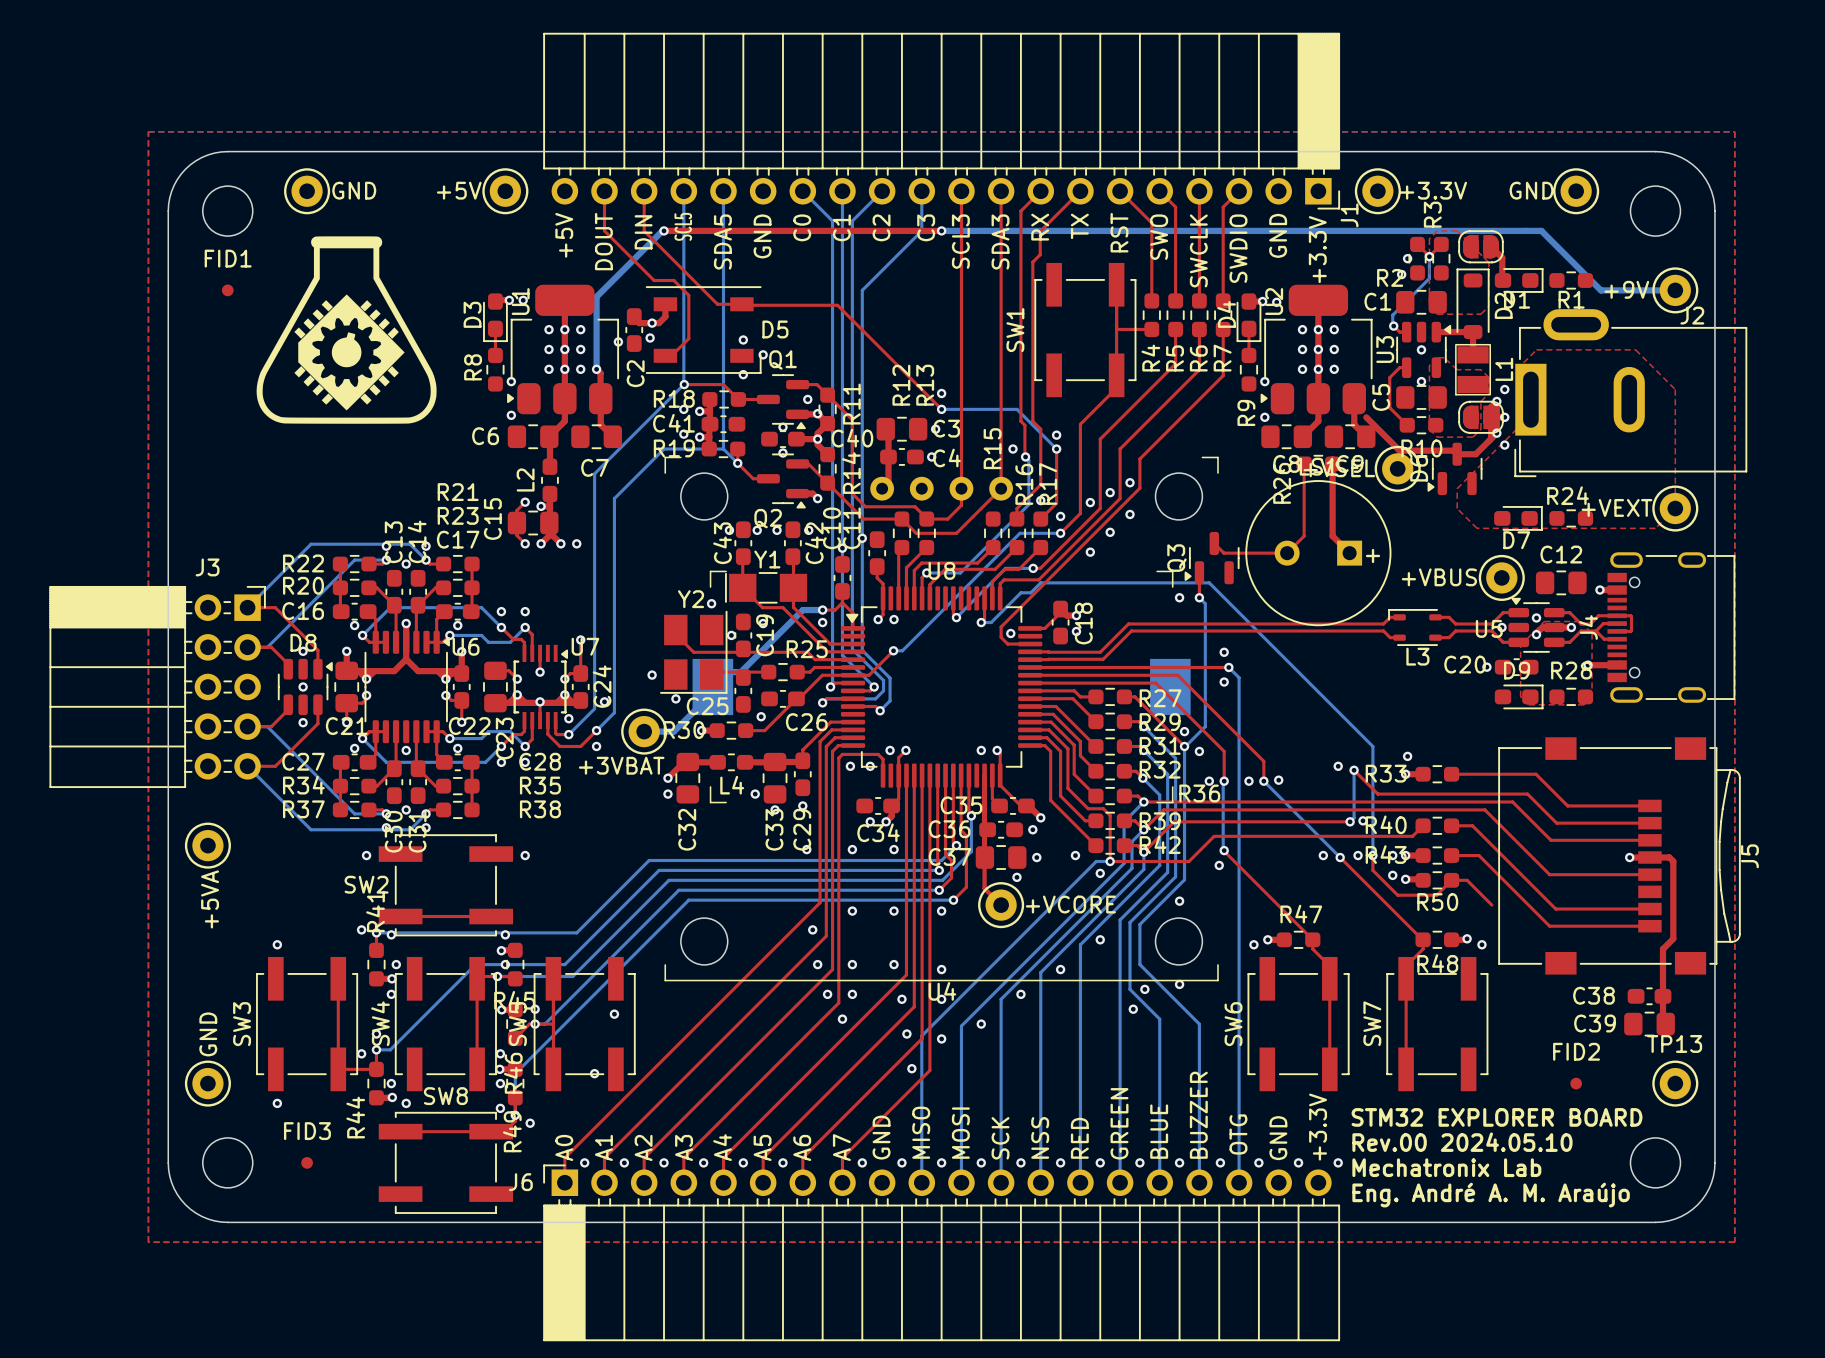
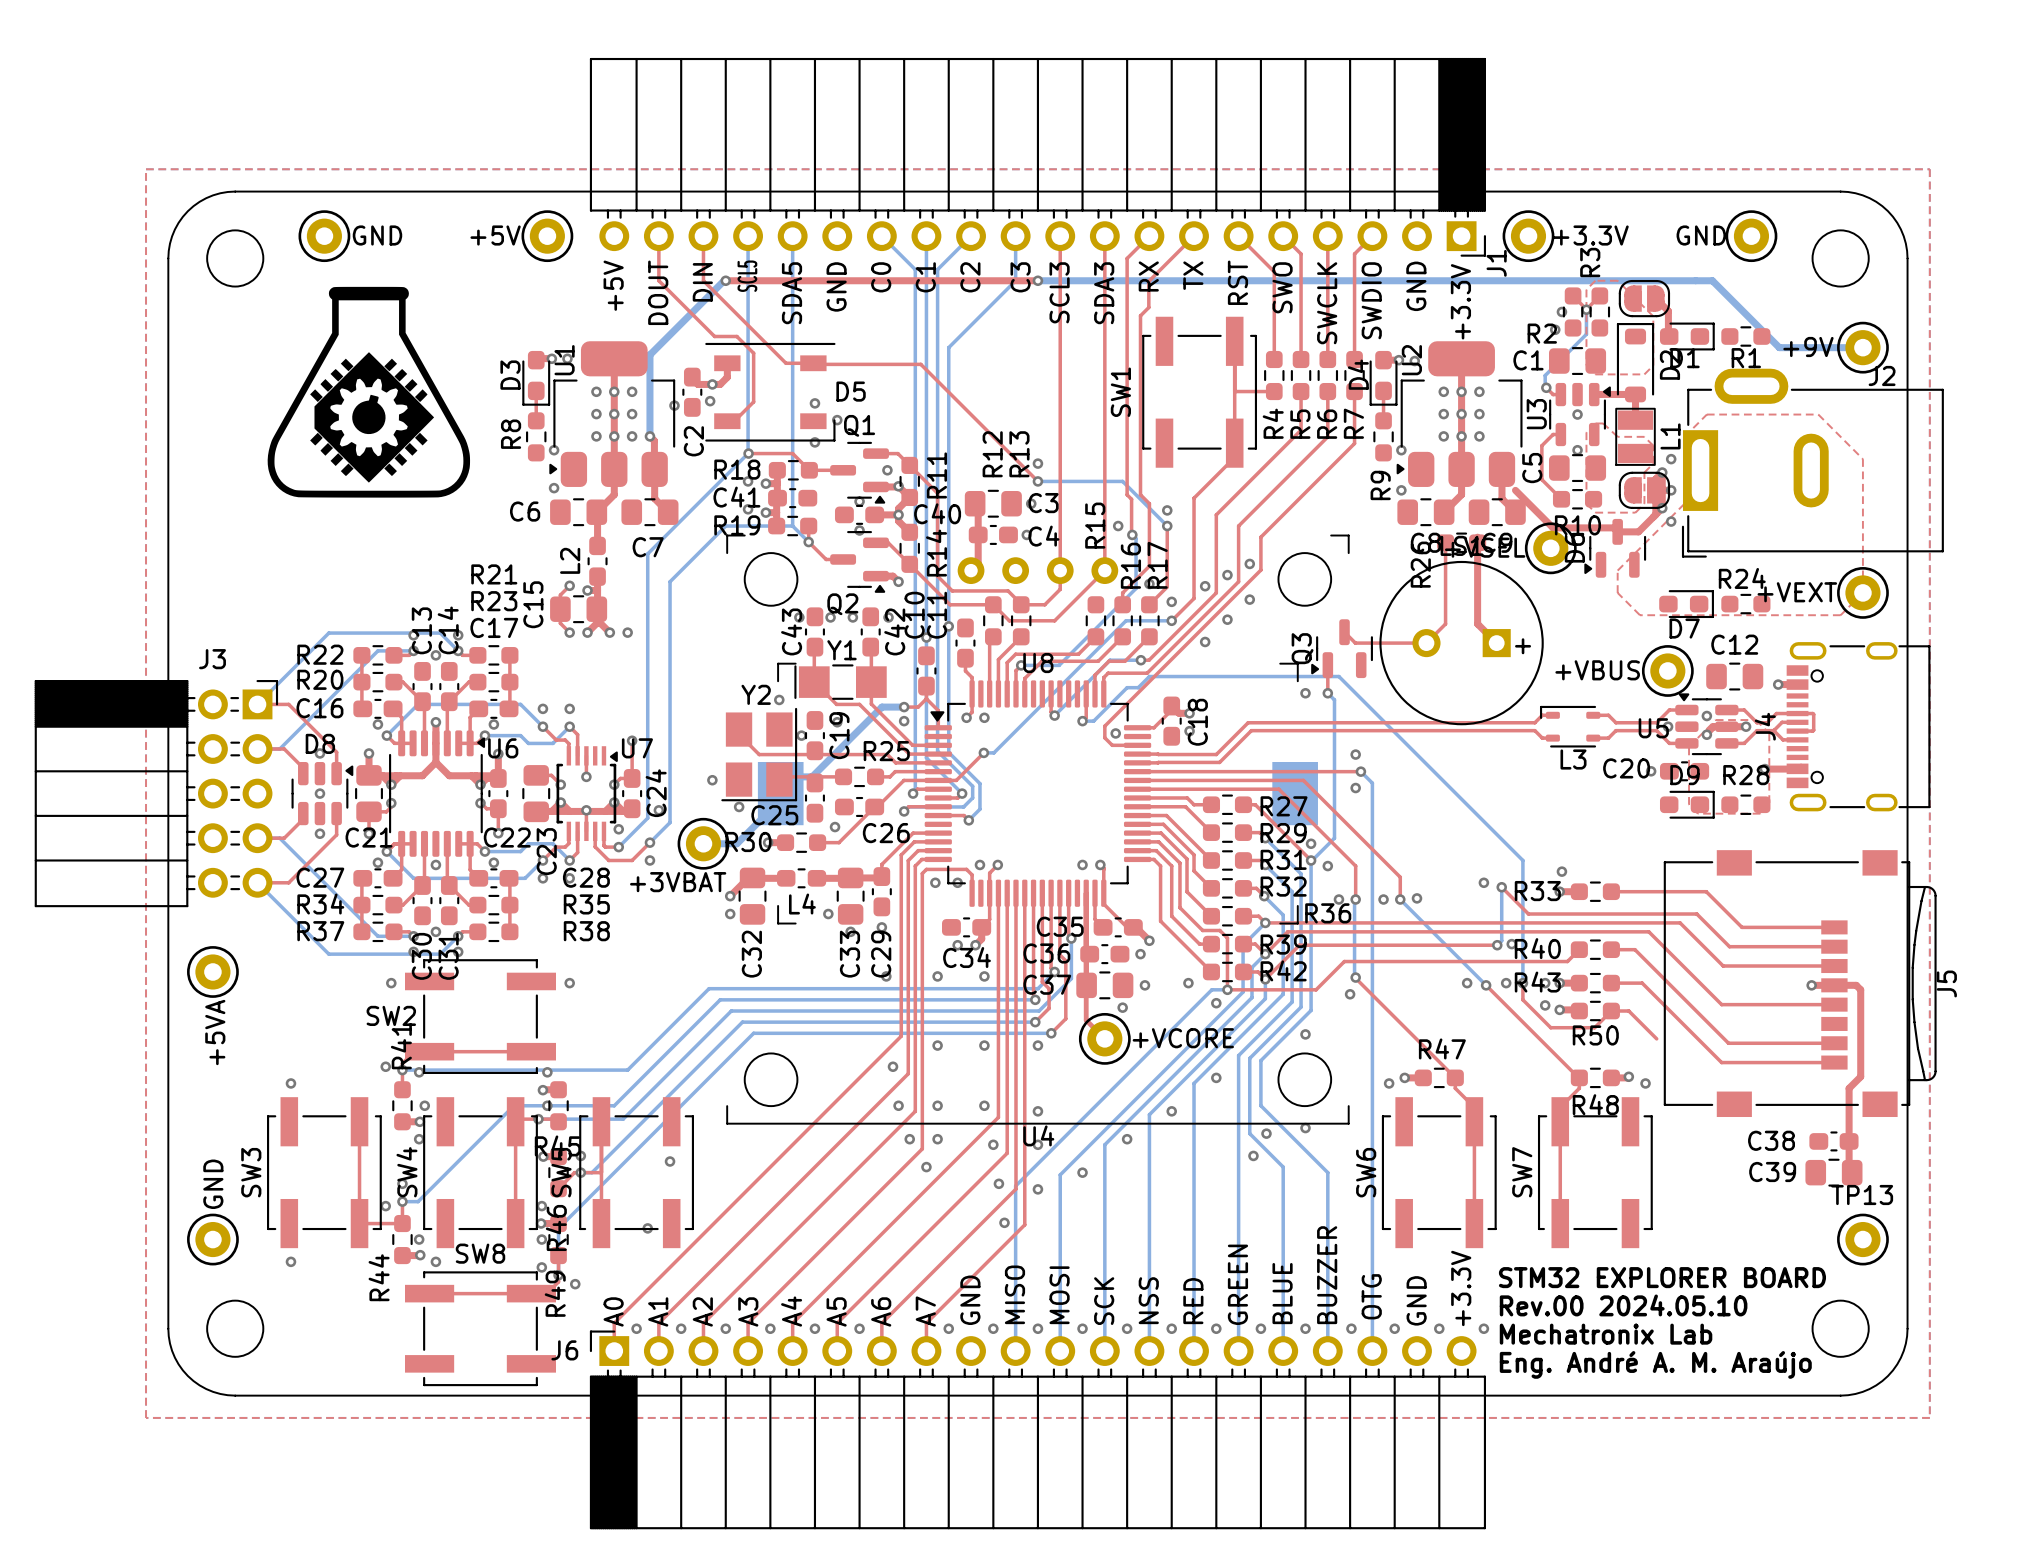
FID1: (227, 290) -> none
FID2: (1576, 1083) -> none
FID3: (307, 1162) -> none

